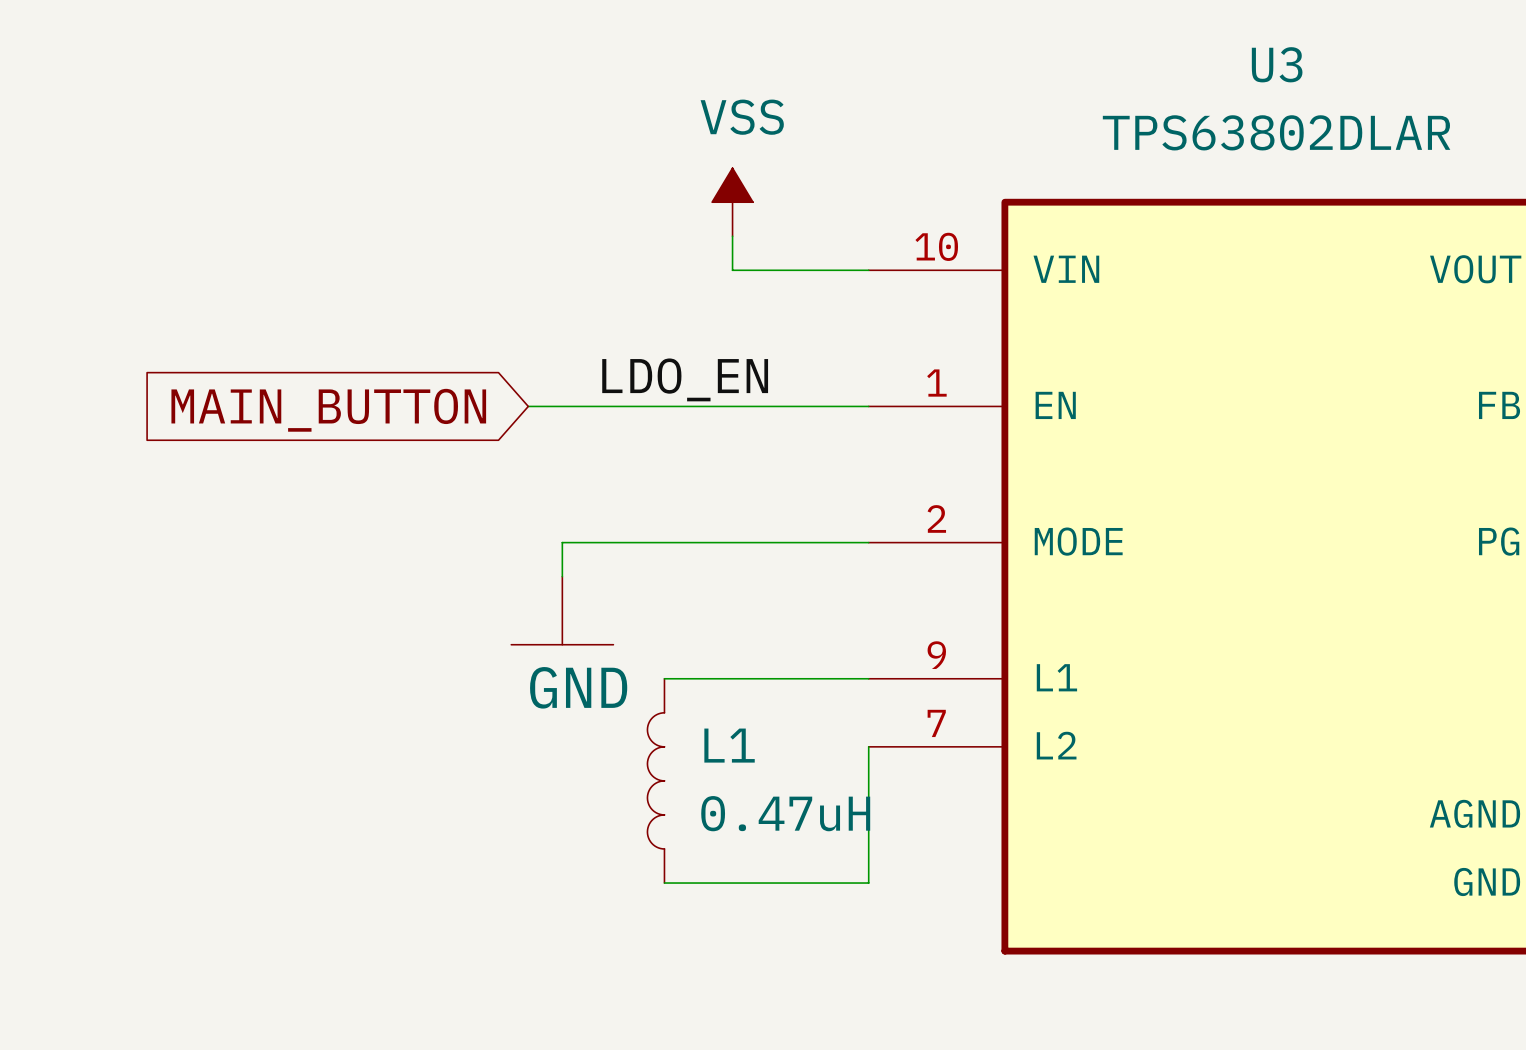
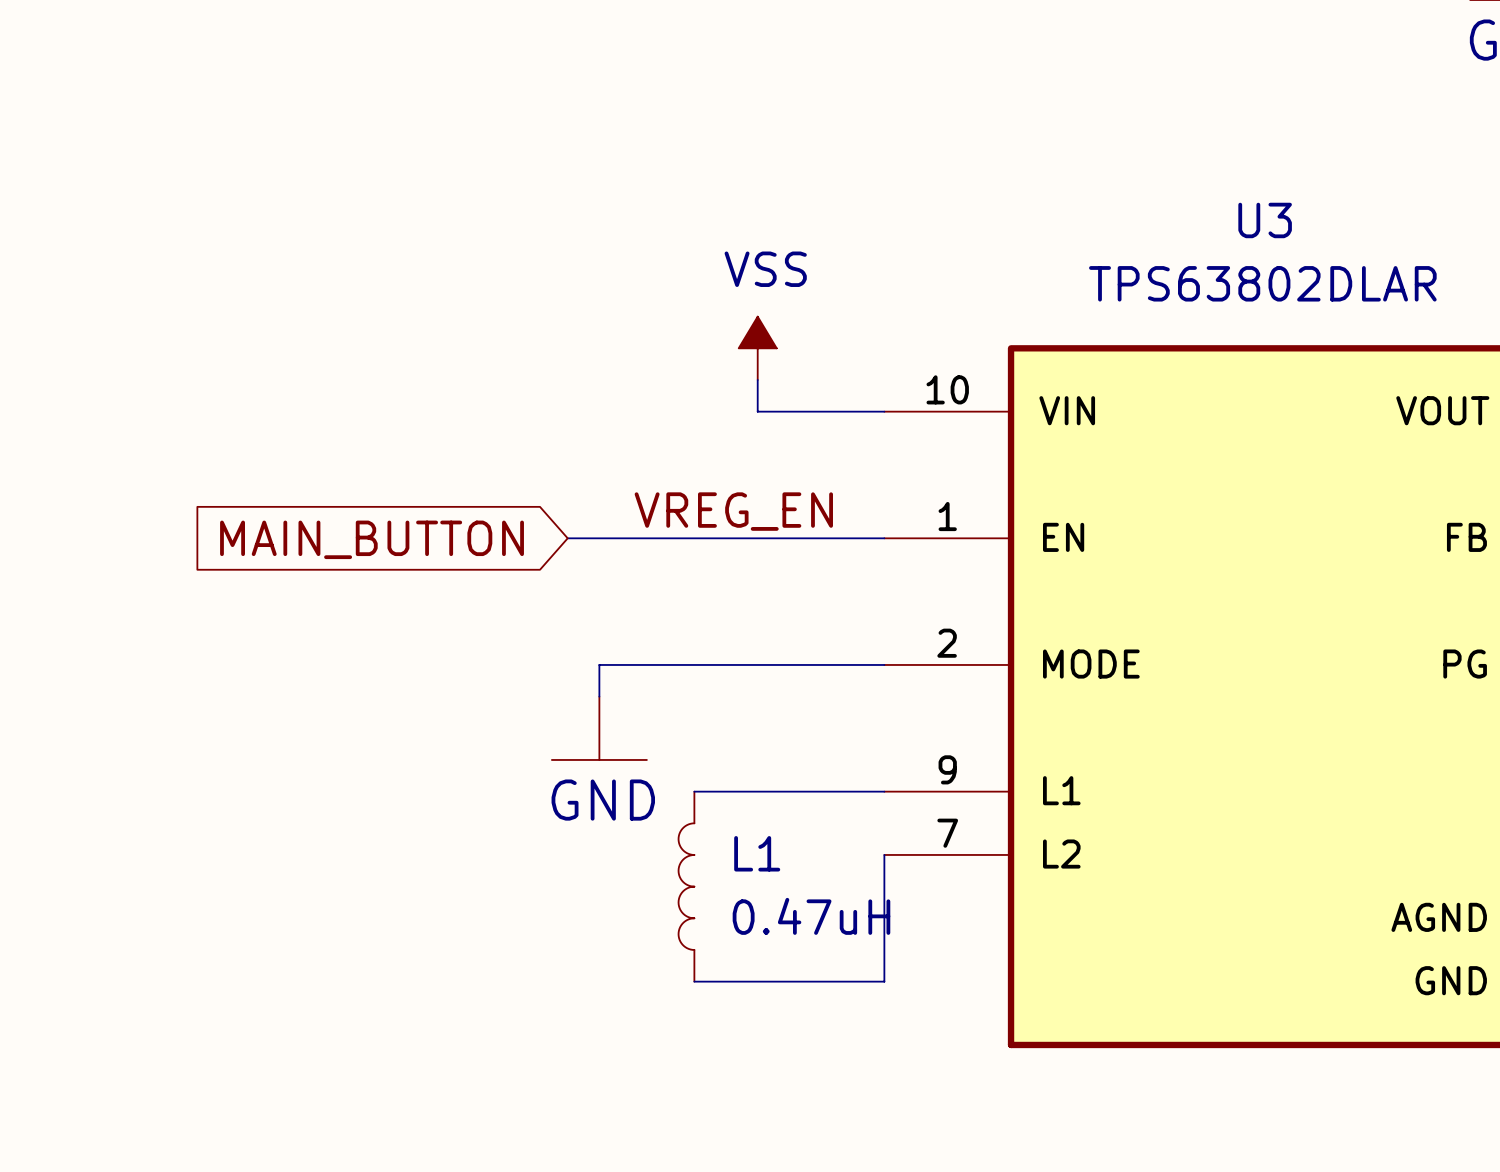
label: LDO_EN (685, 379) -> VREG_EN (733, 511)

